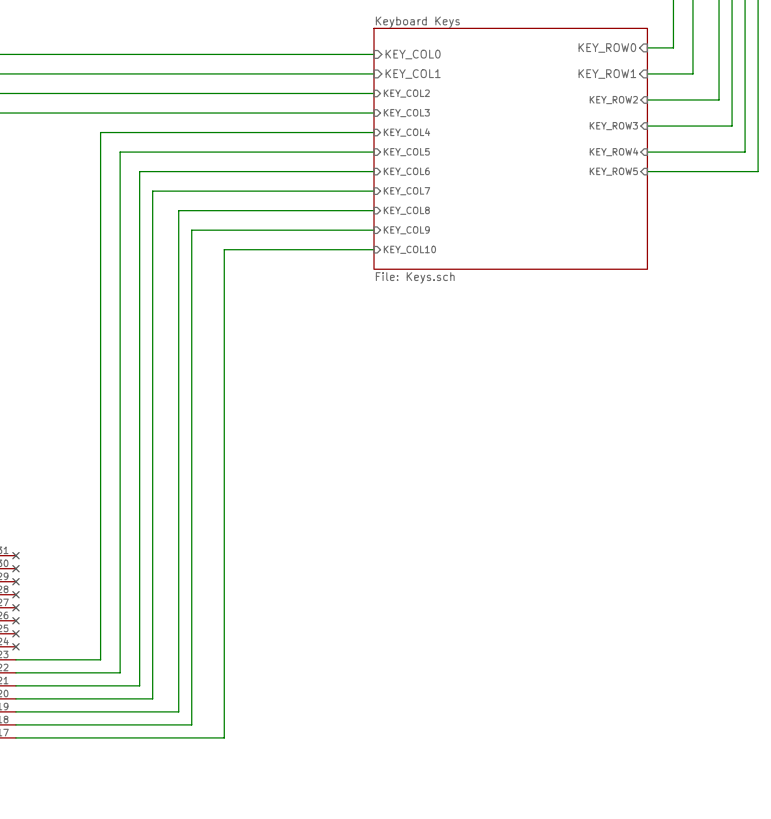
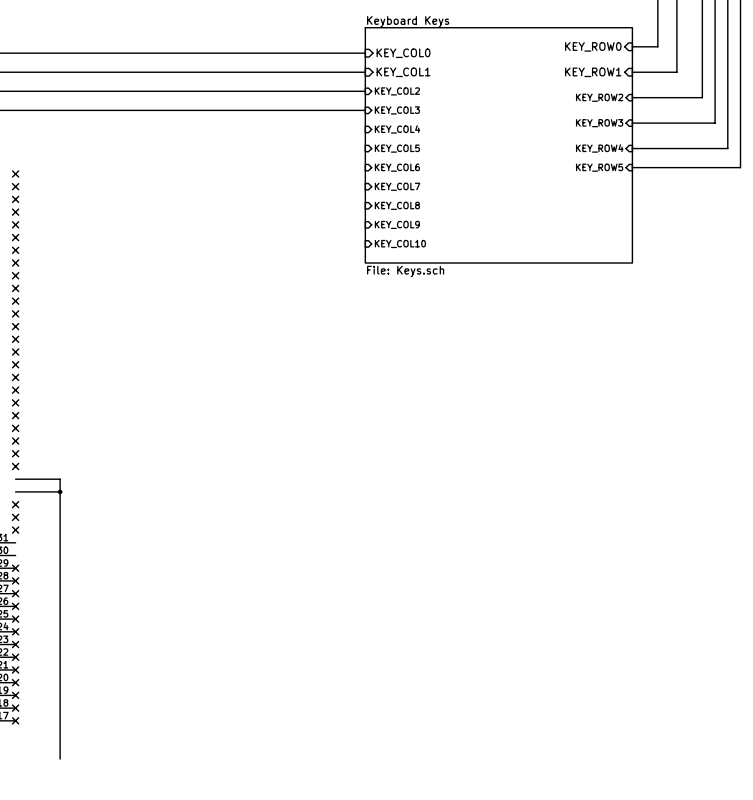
wire: (374, 132) (100, 132) (100, 659) (15, 659) -> none
wire: (374, 152) (120, 152) (120, 672) (15, 672) -> none
wire: (374, 171) (139, 171) (139, 685) (15, 685) -> none
no-connect mark: none -> (15, 173)
no-connect mark: none -> (15, 186)
wire: (374, 191) (152, 191) (152, 698) (15, 698) -> none
no-connect mark: none -> (15, 199)
wire: (374, 210) (178, 210) (178, 711) (15, 711) -> none
no-connect mark: none -> (15, 212)
no-connect mark: none -> (15, 224)
wire: (374, 230) (191, 230) (191, 724) (15, 724) -> none
no-connect mark: none -> (15, 237)
wire: (374, 249) (224, 249) (224, 737) (15, 737) -> none
no-connect mark: none -> (15, 250)
no-connect mark: none -> (15, 263)
no-connect mark: none -> (15, 275)
no-connect mark: none -> (15, 288)
no-connect mark: none -> (15, 301)
no-connect mark: none -> (15, 313)
no-connect mark: none -> (15, 326)
no-connect mark: none -> (15, 339)
no-connect mark: none -> (15, 352)
no-connect mark: none -> (15, 364)
no-connect mark: none -> (15, 377)
no-connect mark: none -> (15, 390)
no-connect mark: none -> (15, 402)
no-connect mark: none -> (15, 415)
no-connect mark: none -> (15, 428)
no-connect mark: none -> (15, 441)
no-connect mark: none -> (15, 453)
no-connect mark: none -> (15, 466)
wire: none -> (15, 479) (60, 479) (60, 758)
wire: none -> (15, 491) (60, 491)
junction: none -> (60, 491)
no-connect mark: none -> (15, 504)
no-connect mark: none -> (15, 517)
no-connect mark: none -> (15, 530)
no-connect mark: (15, 555) -> none
no-connect mark: (15, 568) -> none
no-connect mark: none -> (15, 644)
no-connect mark: none -> (15, 657)
no-connect mark: none -> (15, 669)
no-connect mark: none -> (15, 682)
no-connect mark: none -> (15, 695)
no-connect mark: none -> (15, 708)
no-connect mark: none -> (15, 720)

